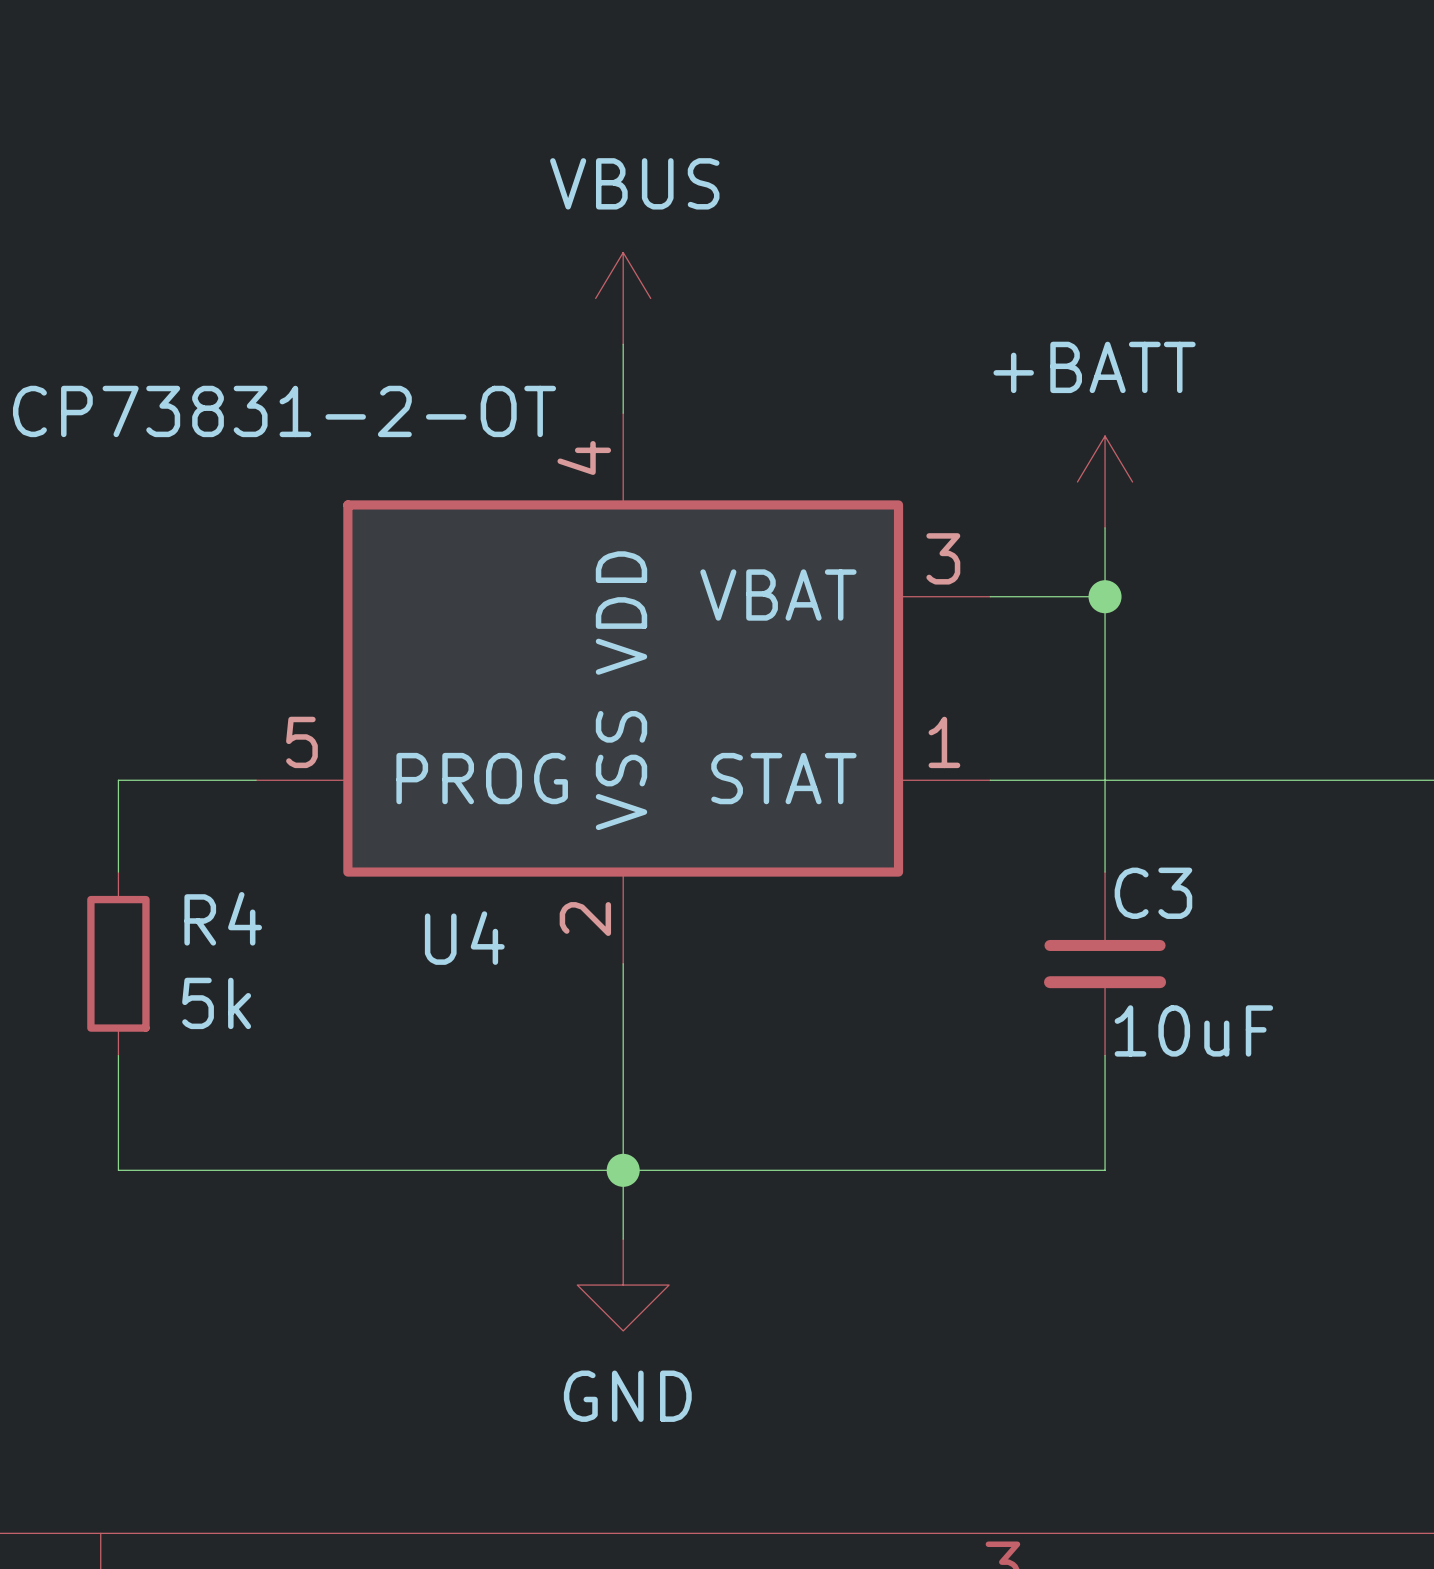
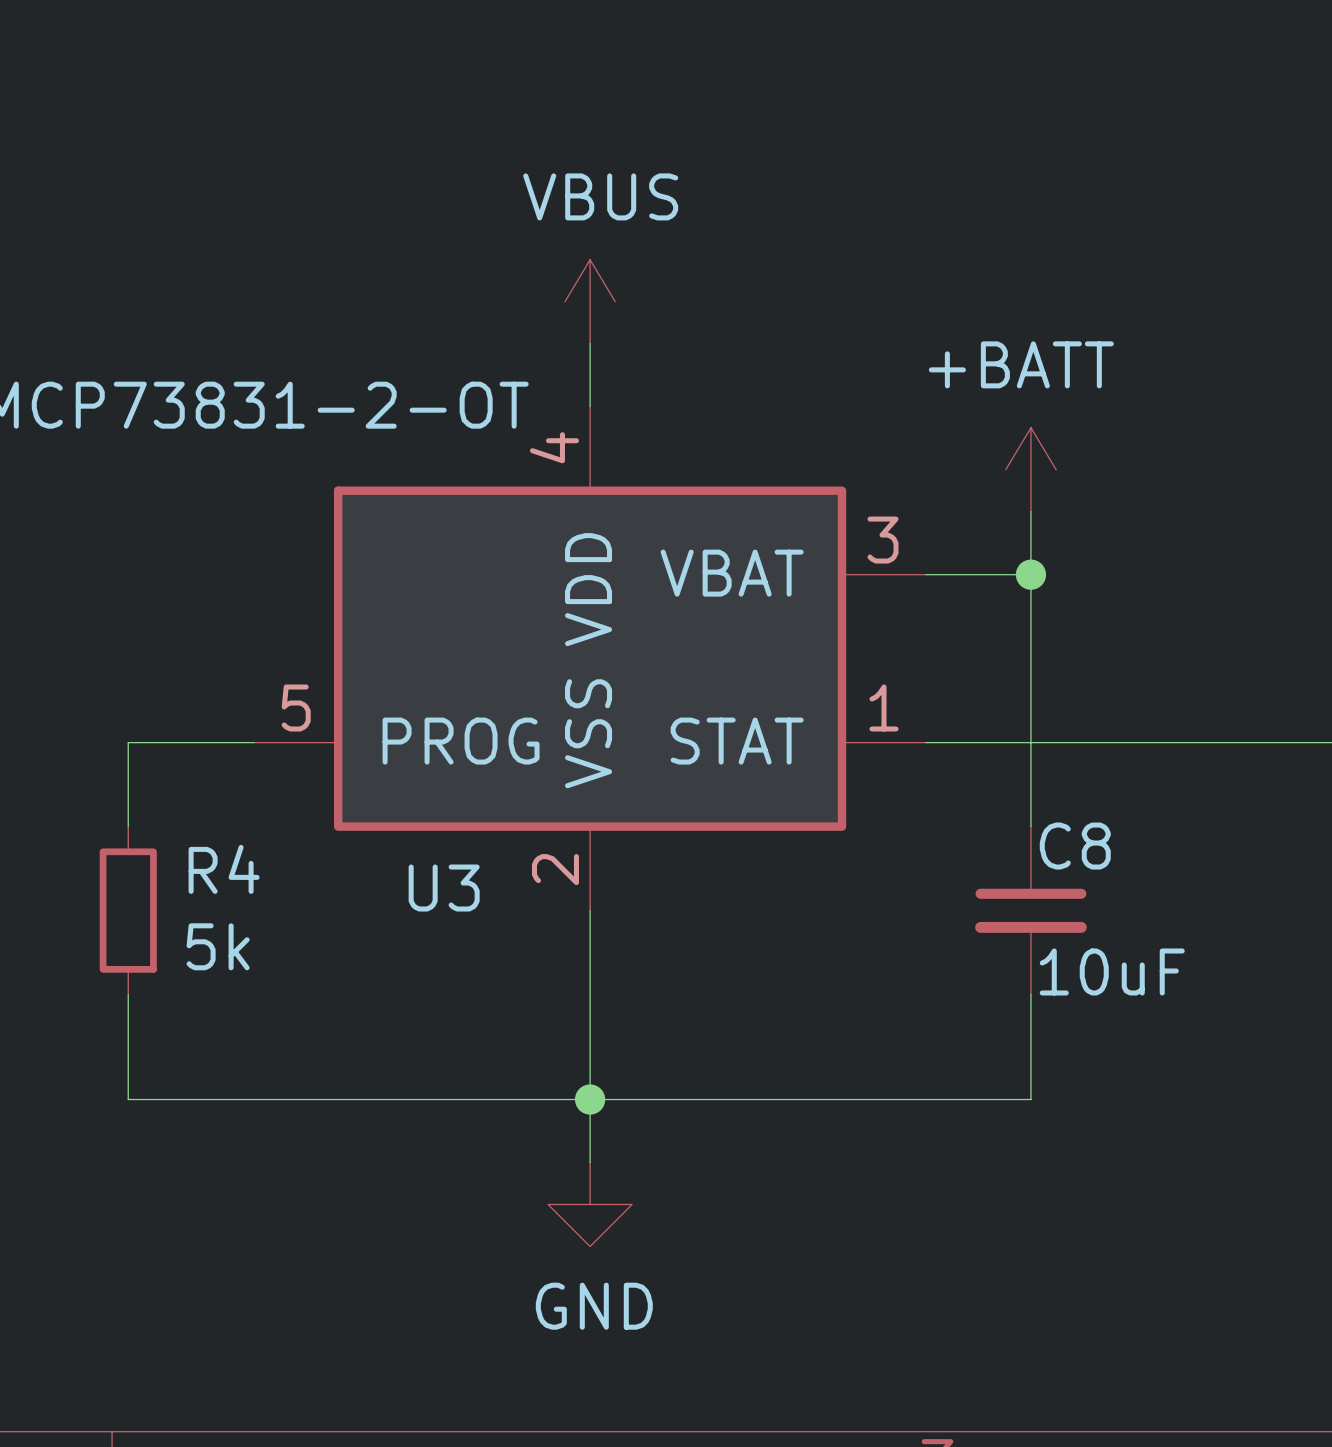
C3 name: C3 (1153, 893) -> C8 (1075, 846)
U4 name: U4 (464, 938) -> U3 (444, 888)

